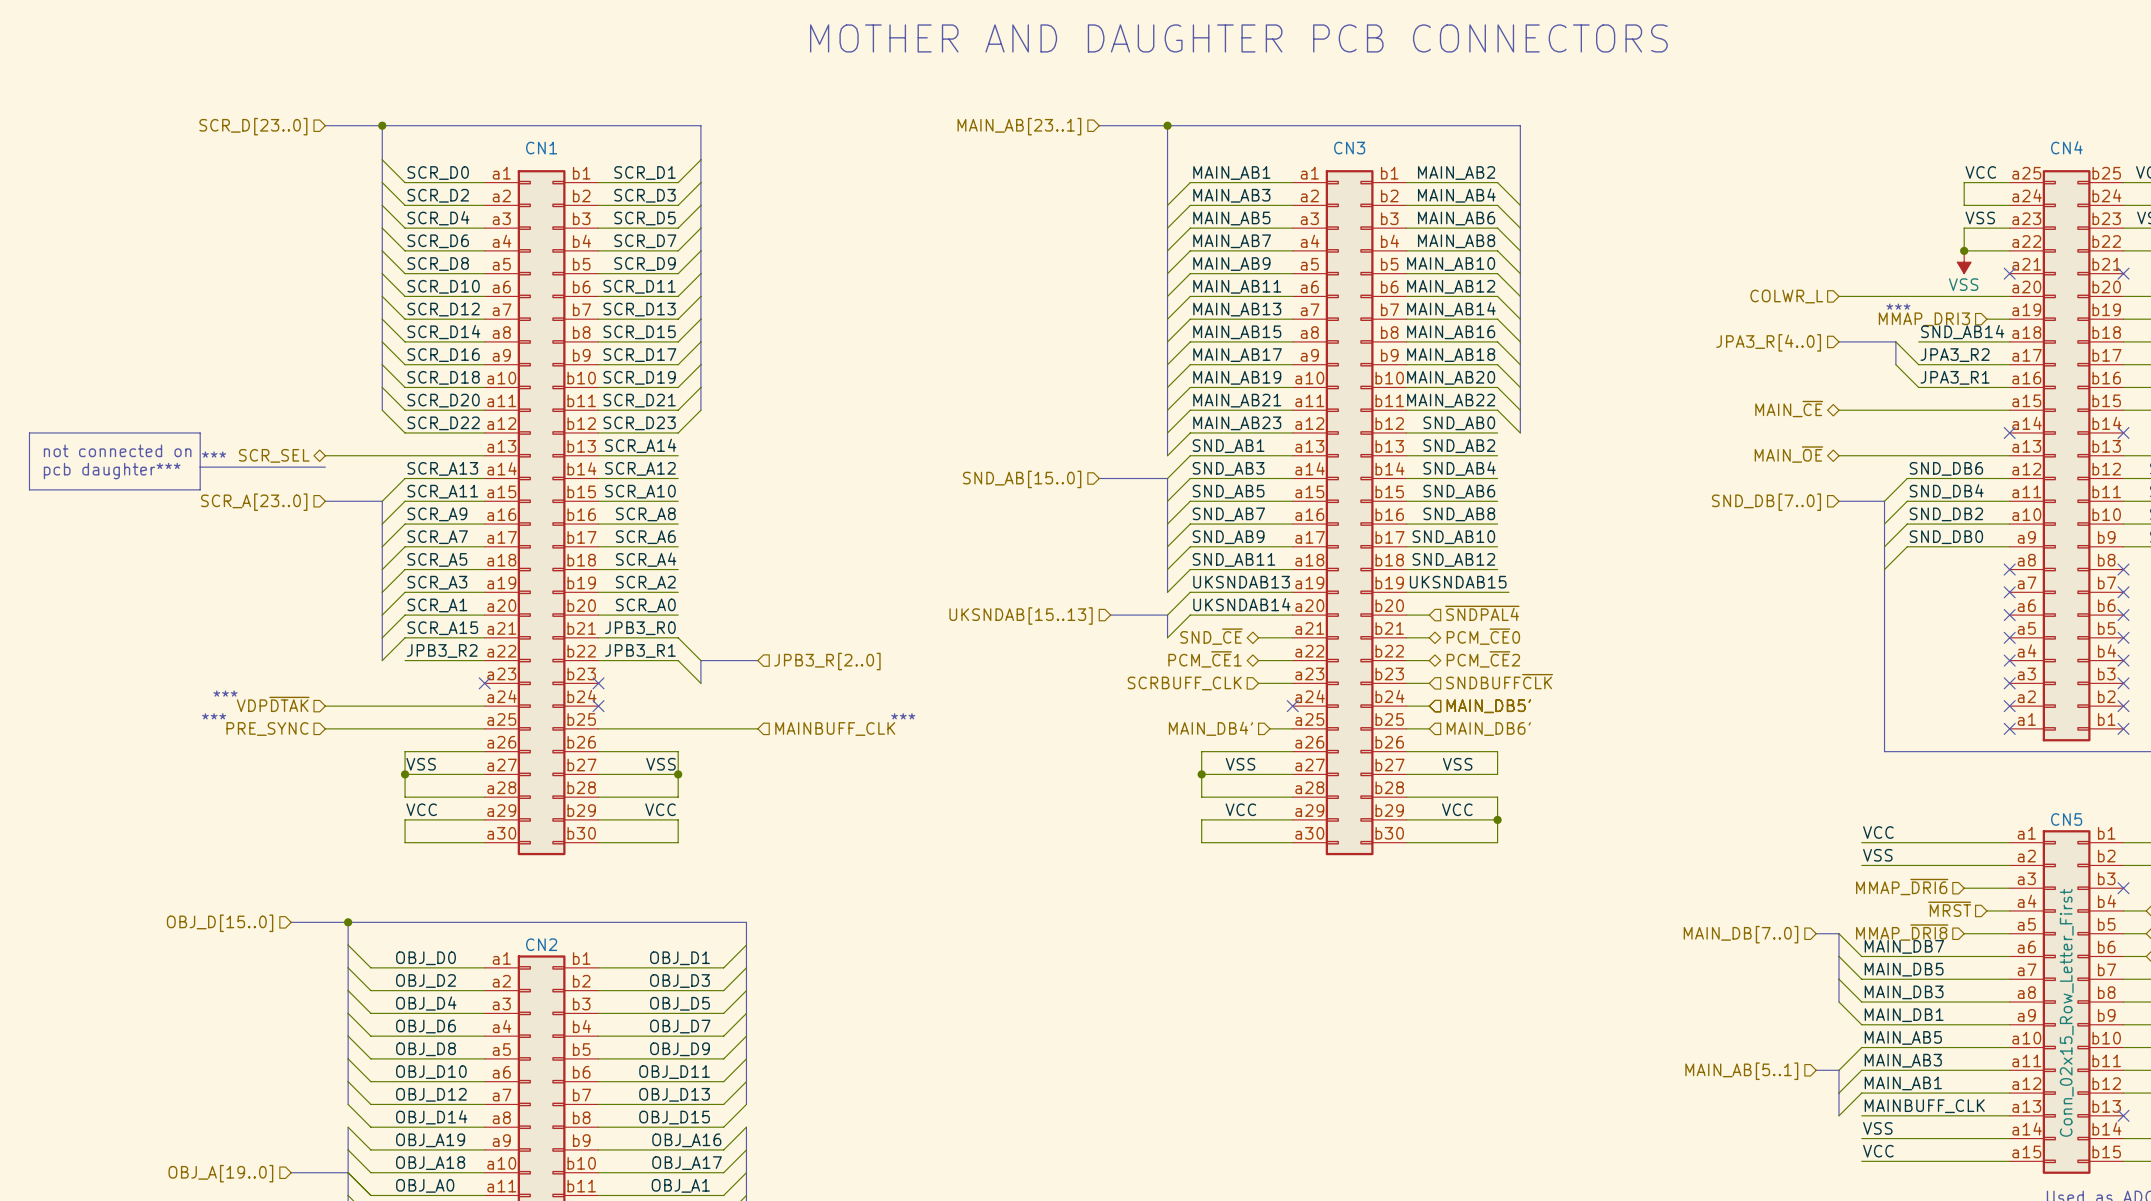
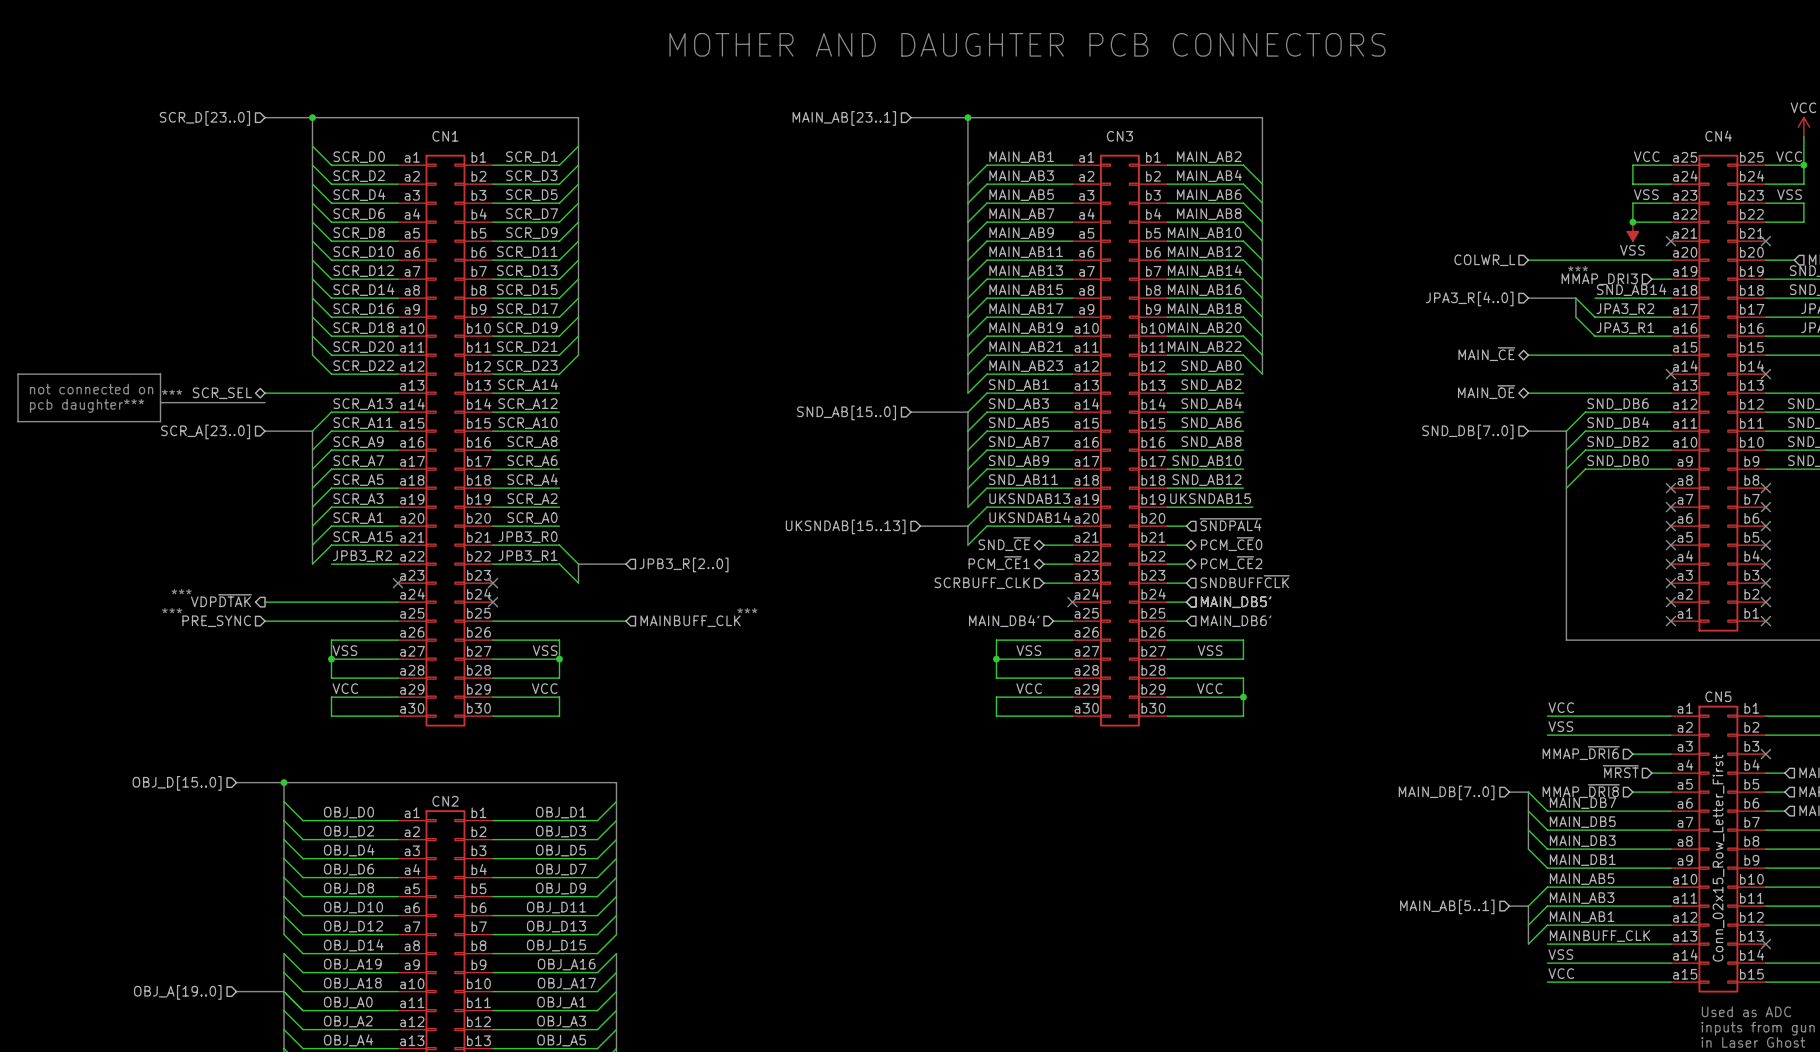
hierarchical label shape: input (273, 704) -> output (221, 600)

